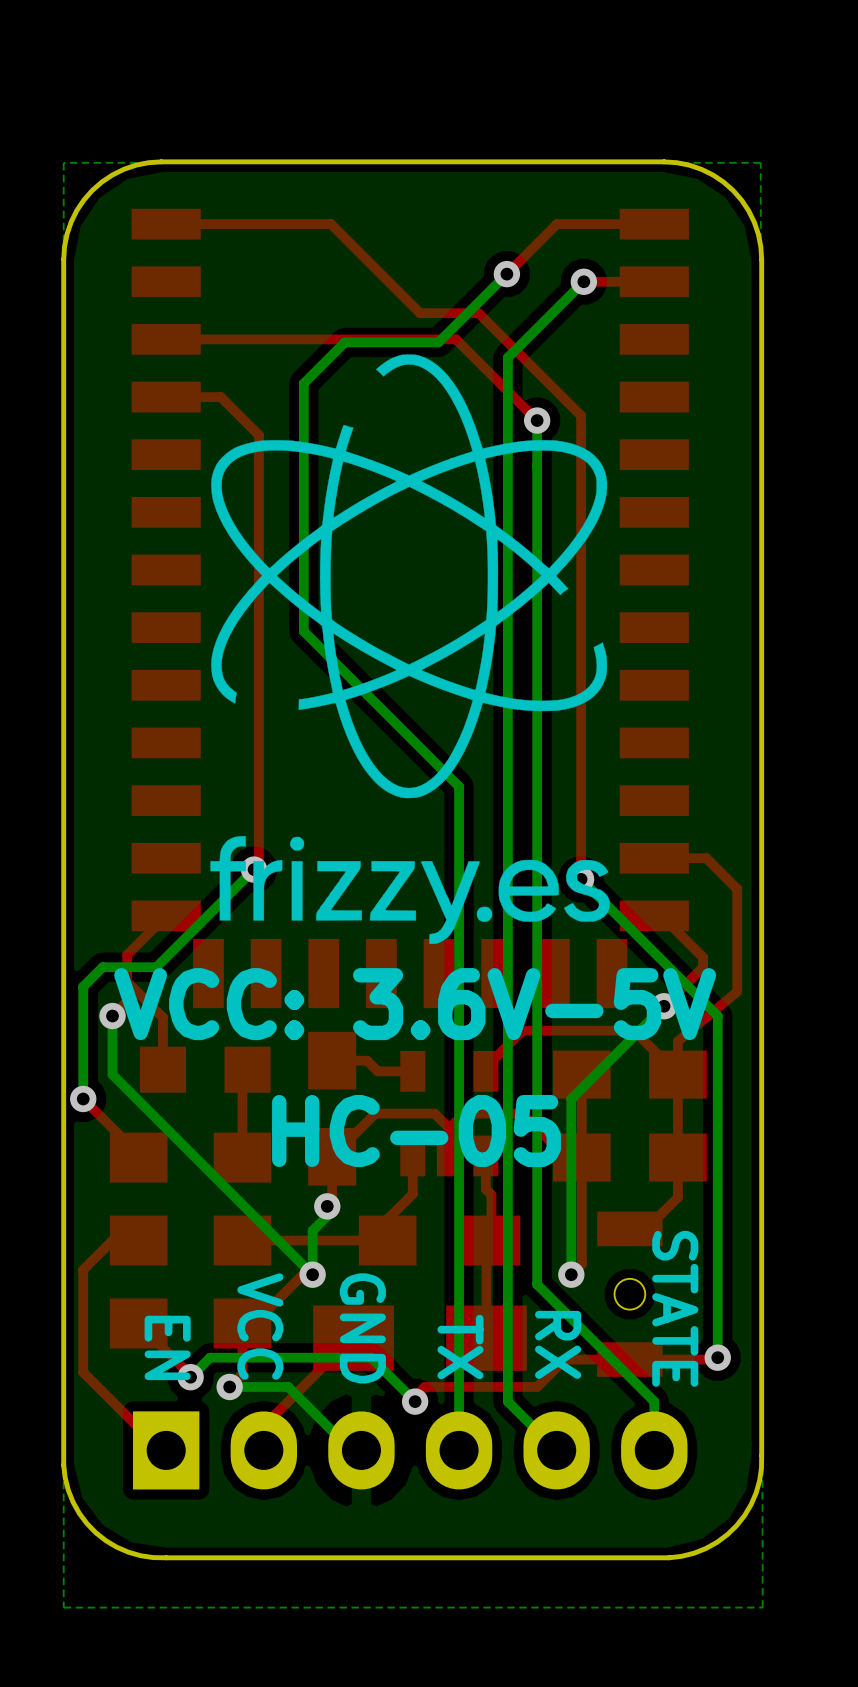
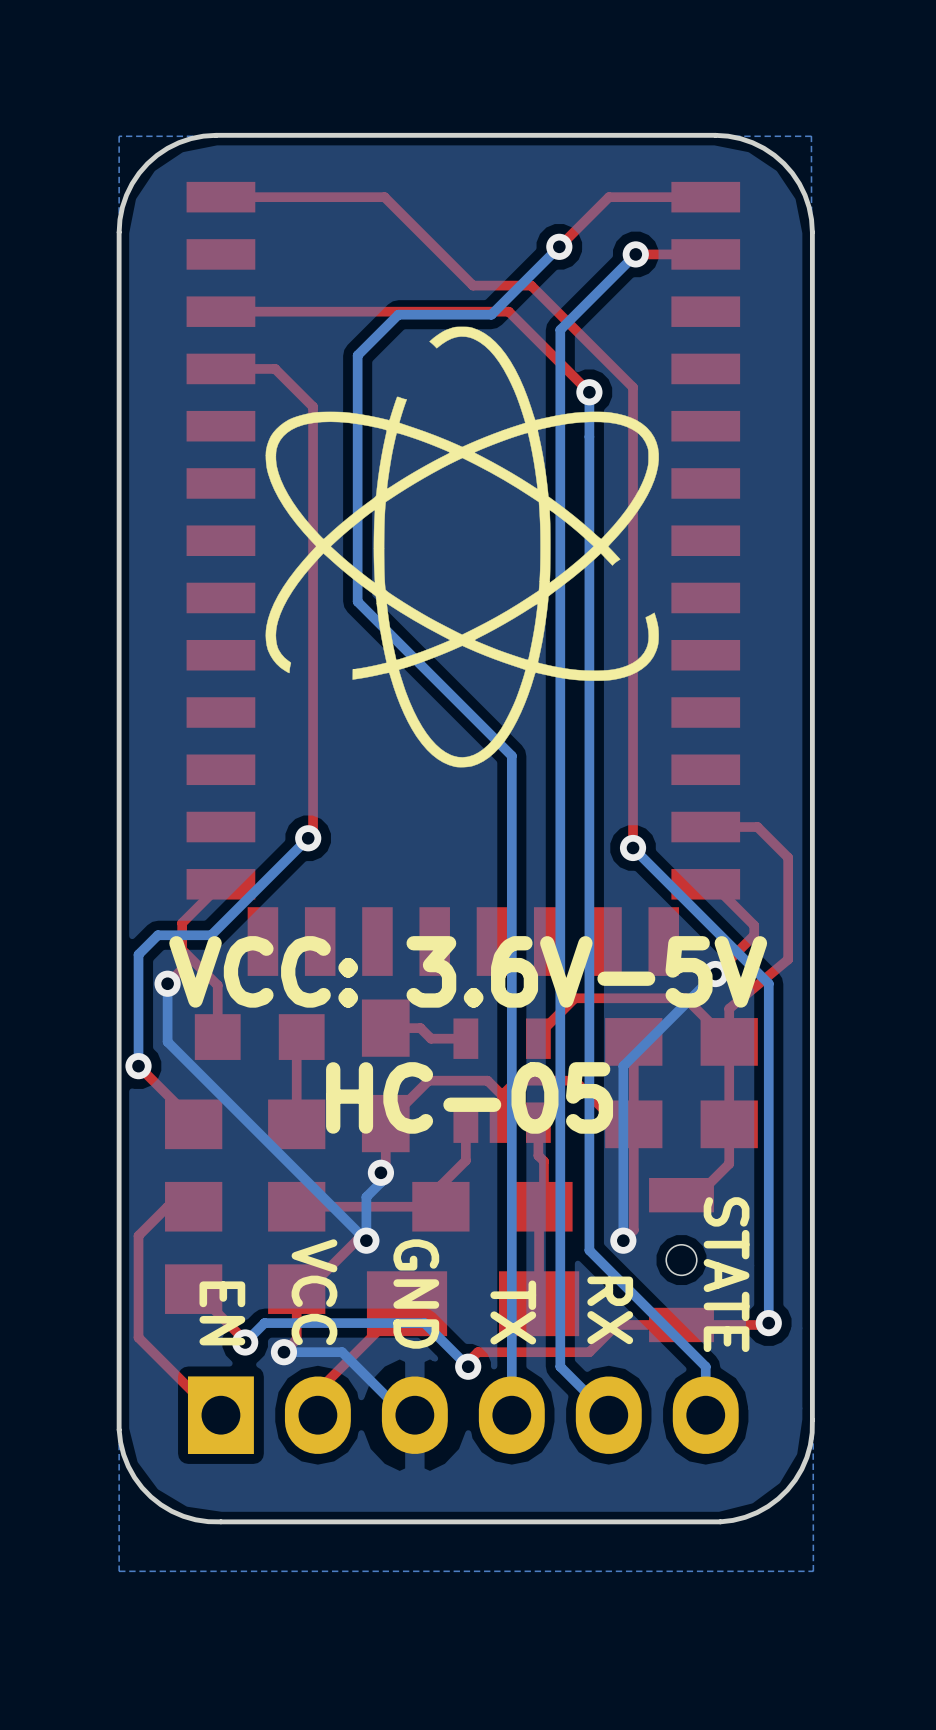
drawing: [210, 835, 610, 945] -> none

